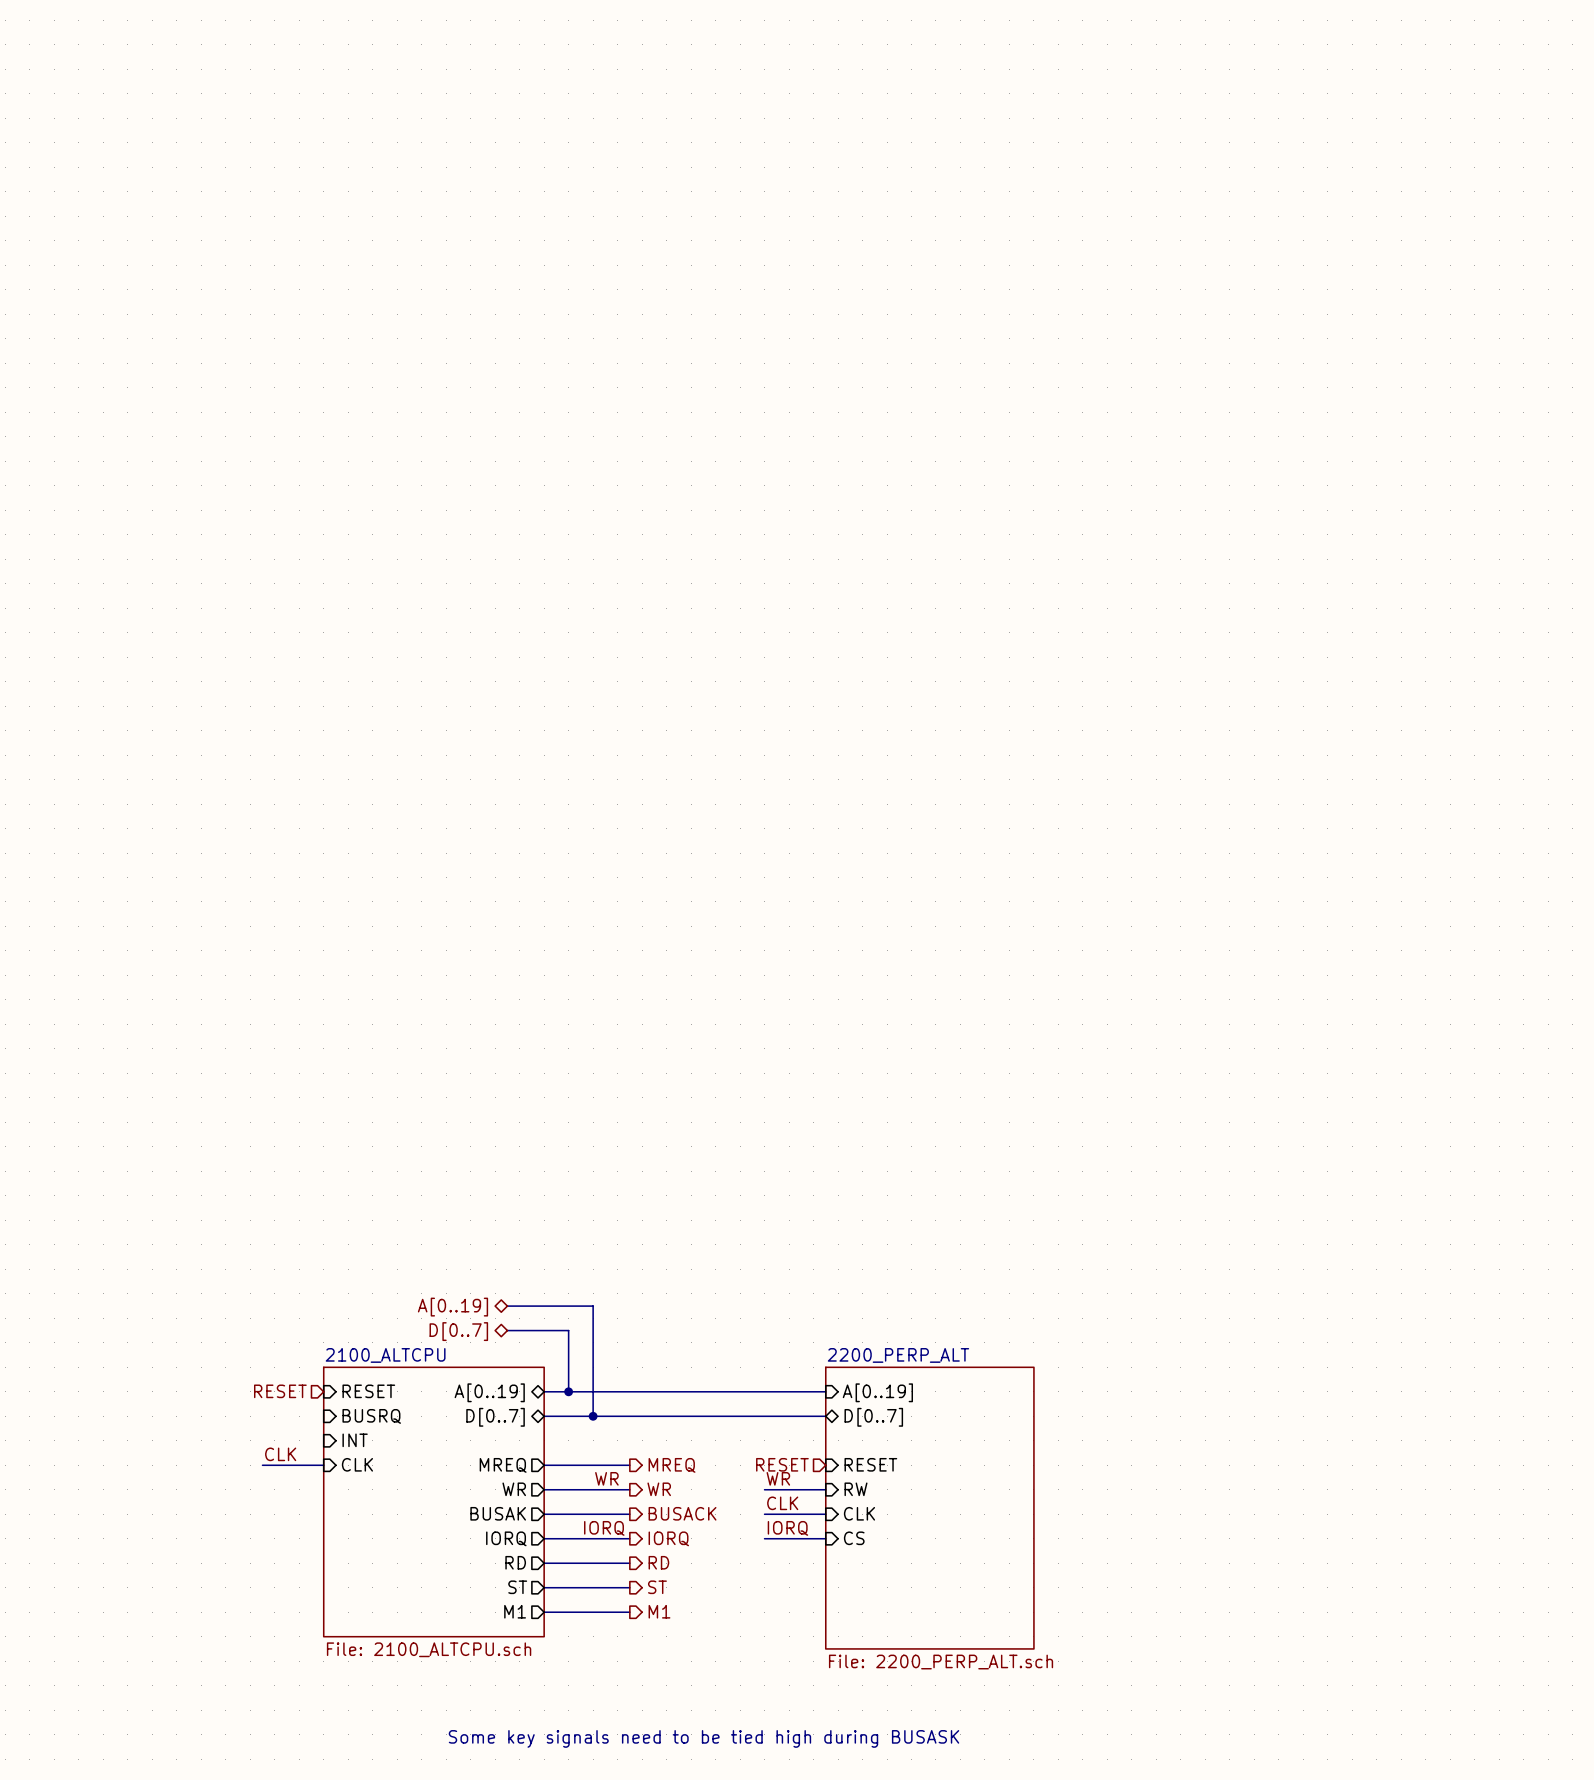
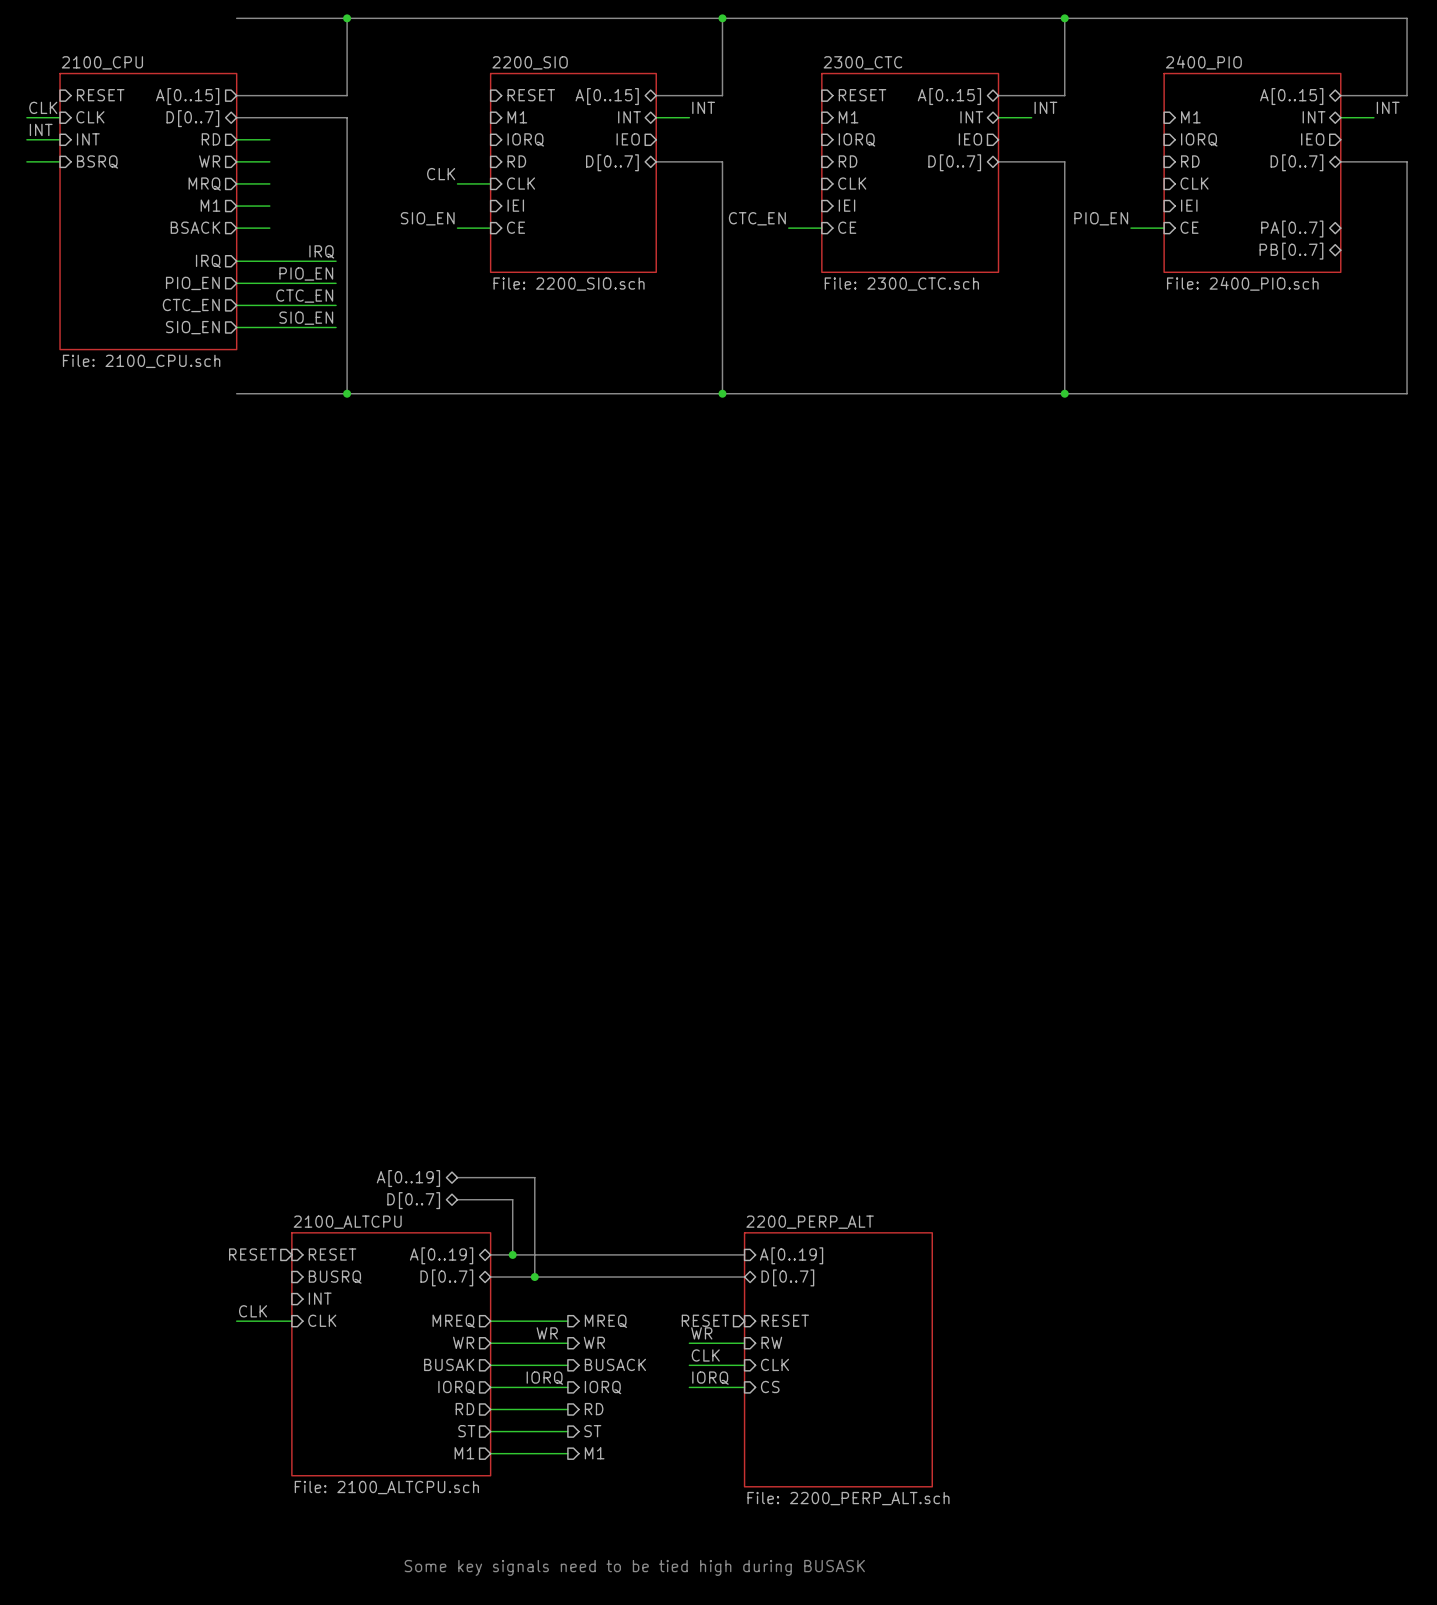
bus: none -> (236, 18) (1407, 18) (1407, 95) (1340, 95)
bus: none -> (347, 18) (347, 95) (236, 95)
junction: none -> (347, 18)
bus: none -> (722, 18) (722, 95) (656, 95)
junction: none -> (722, 18)
bus: none -> (1064, 18) (1064, 95) (998, 95)
junction: none -> (1064, 18)
sheet pin: none -> RESET (100, 95)
sheet pin: none -> RESET (531, 95)
sheet pin: none -> RESET (862, 95)
sheet pin: none -> A[0..15] (187, 96)
sheet pin: none -> A[0..15] (607, 96)
sheet pin: none -> A[0..15] (949, 96)
sheet pin: none -> A[0..15] (1291, 96)
label: none -> CLK (43, 107)
label: none -> INT (703, 107)
label: none -> INT (1045, 107)
label: none -> INT (1388, 107)
wire: none -> (26, 117) (60, 117)
sheet pin: none -> CLK (90, 117)
bus: none -> (236, 117) (347, 117) (347, 393)
sheet pin: none -> M1 (517, 117)
sheet pin: none -> INT (629, 117)
wire: none -> (656, 117) (689, 117)
sheet pin: none -> M1 (848, 117)
sheet pin: none -> INT (971, 117)
wire: none -> (998, 117) (1031, 117)
sheet pin: none -> M1 (1190, 117)
sheet pin: none -> INT (1314, 117)
wire: none -> (1340, 117) (1373, 117)
sheet pin: none -> D[0..7] (192, 118)
label: none -> INT (41, 129)
sheet pin: none -> INT (88, 139)
sheet pin: none -> RD (211, 139)
sheet pin: none -> IEO (628, 139)
sheet pin: none -> IEO (970, 139)
sheet pin: none -> IEO (1312, 139)
wire: none -> (26, 139) (60, 139)
wire: none -> (236, 139) (269, 139)
sheet pin: none -> IORQ (525, 139)
sheet pin: none -> IORQ (856, 139)
sheet pin: none -> IORQ (1199, 139)
wire: none -> (26, 161) (60, 161)
sheet pin: none -> BSRQ (97, 161)
sheet pin: none -> WR (209, 161)
wire: none -> (236, 161) (269, 161)
sheet pin: none -> RD (516, 161)
bus: none -> (656, 161) (722, 161) (722, 393)
sheet pin: none -> RD (848, 161)
bus: none -> (998, 161) (1064, 161) (1064, 393)
sheet pin: none -> RD (1190, 161)
bus: none -> (1340, 161) (1407, 161) (1407, 393) (236, 393)
sheet pin: none -> D[0..7] (612, 162)
sheet pin: none -> D[0..7] (954, 162)
sheet pin: none -> D[0..7] (1296, 162)
sheet 2200_SIO: none -> File: 2200_SIO.sch (573, 172)
sheet 2300_CTC: none -> File: 2300_CTC.sch (910, 172)
sheet 2400_PIO: none -> File: 2400_PIO.sch (1252, 172)
label: none -> CLK (441, 174)
sheet pin: none -> CLK (521, 183)
sheet pin: none -> CLK (852, 183)
sheet pin: none -> CLK (1194, 183)
sheet pin: none -> MRQ (204, 184)
wire: none -> (236, 183) (269, 183)
wire: none -> (457, 183) (490, 183)
sheet pin: none -> M1 (210, 205)
wire: none -> (236, 206) (269, 206)
sheet pin: none -> IEI (515, 205)
sheet pin: none -> IEI (847, 205)
sheet pin: none -> IEI (1189, 205)
sheet 2100_CPU: none -> File: 2100_CPU.sch (148, 211)
label: none -> SIO_EN (427, 218)
label: none -> CTC_EN (757, 218)
label: none -> PIO_EN (1101, 218)
sheet pin: none -> BSACK (195, 227)
sheet pin: none -> CE (516, 227)
sheet pin: none -> CE (847, 227)
sheet pin: none -> CE (1189, 227)
wire: none -> (236, 228) (269, 228)
wire: none -> (457, 228) (490, 228)
wire: none -> (788, 228) (821, 228)
wire: none -> (1131, 228) (1164, 228)
sheet pin: none -> PA[0..7] (1292, 229)
sheet pin: none -> PB[0..7] (1291, 251)
label: none -> IRQ (321, 251)
sheet pin: none -> IRQ (208, 261)
wire: none -> (236, 261) (336, 261)
label: none -> PIO_EN (306, 274)
sheet pin: none -> PIO_EN (192, 283)
wire: none -> (236, 283) (336, 283)
label: none -> CTC_EN (304, 296)
sheet pin: none -> CTC_EN (191, 305)
wire: none -> (236, 305) (336, 305)
label: none -> SIO_EN (306, 318)
sheet pin: none -> SIO_EN (192, 327)
wire: none -> (236, 327) (336, 327)
junction: none -> (347, 393)
junction: none -> (722, 393)
junction: none -> (1064, 393)

